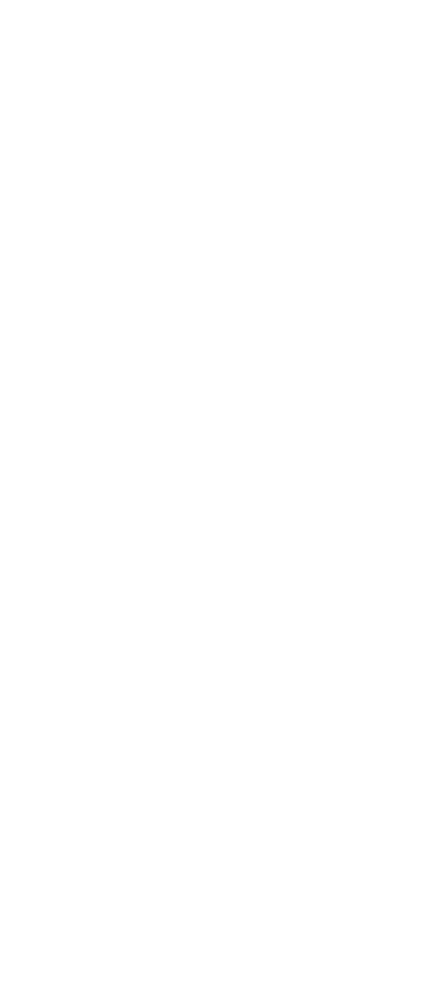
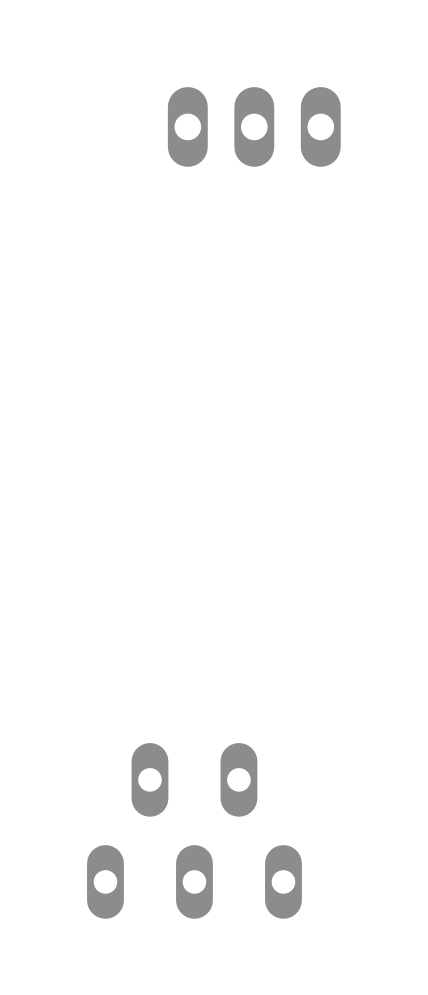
part: none -> (254, 126)
part: none -> (194, 830)

